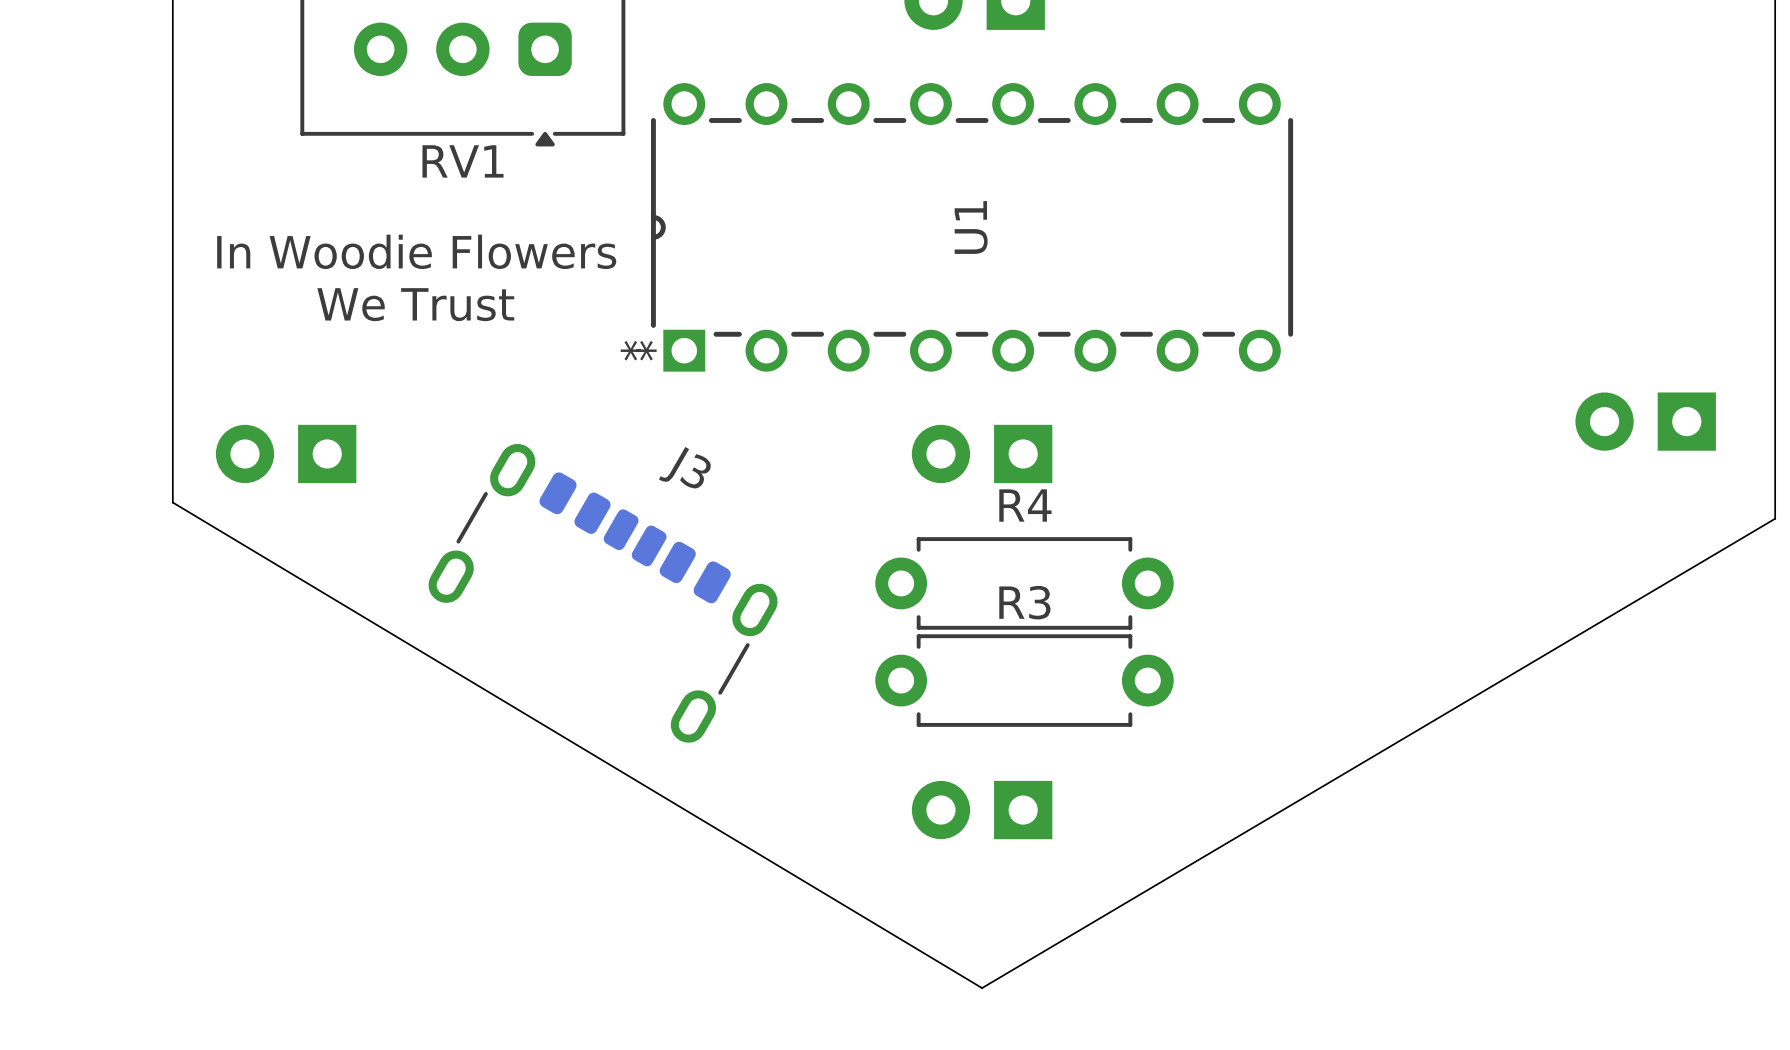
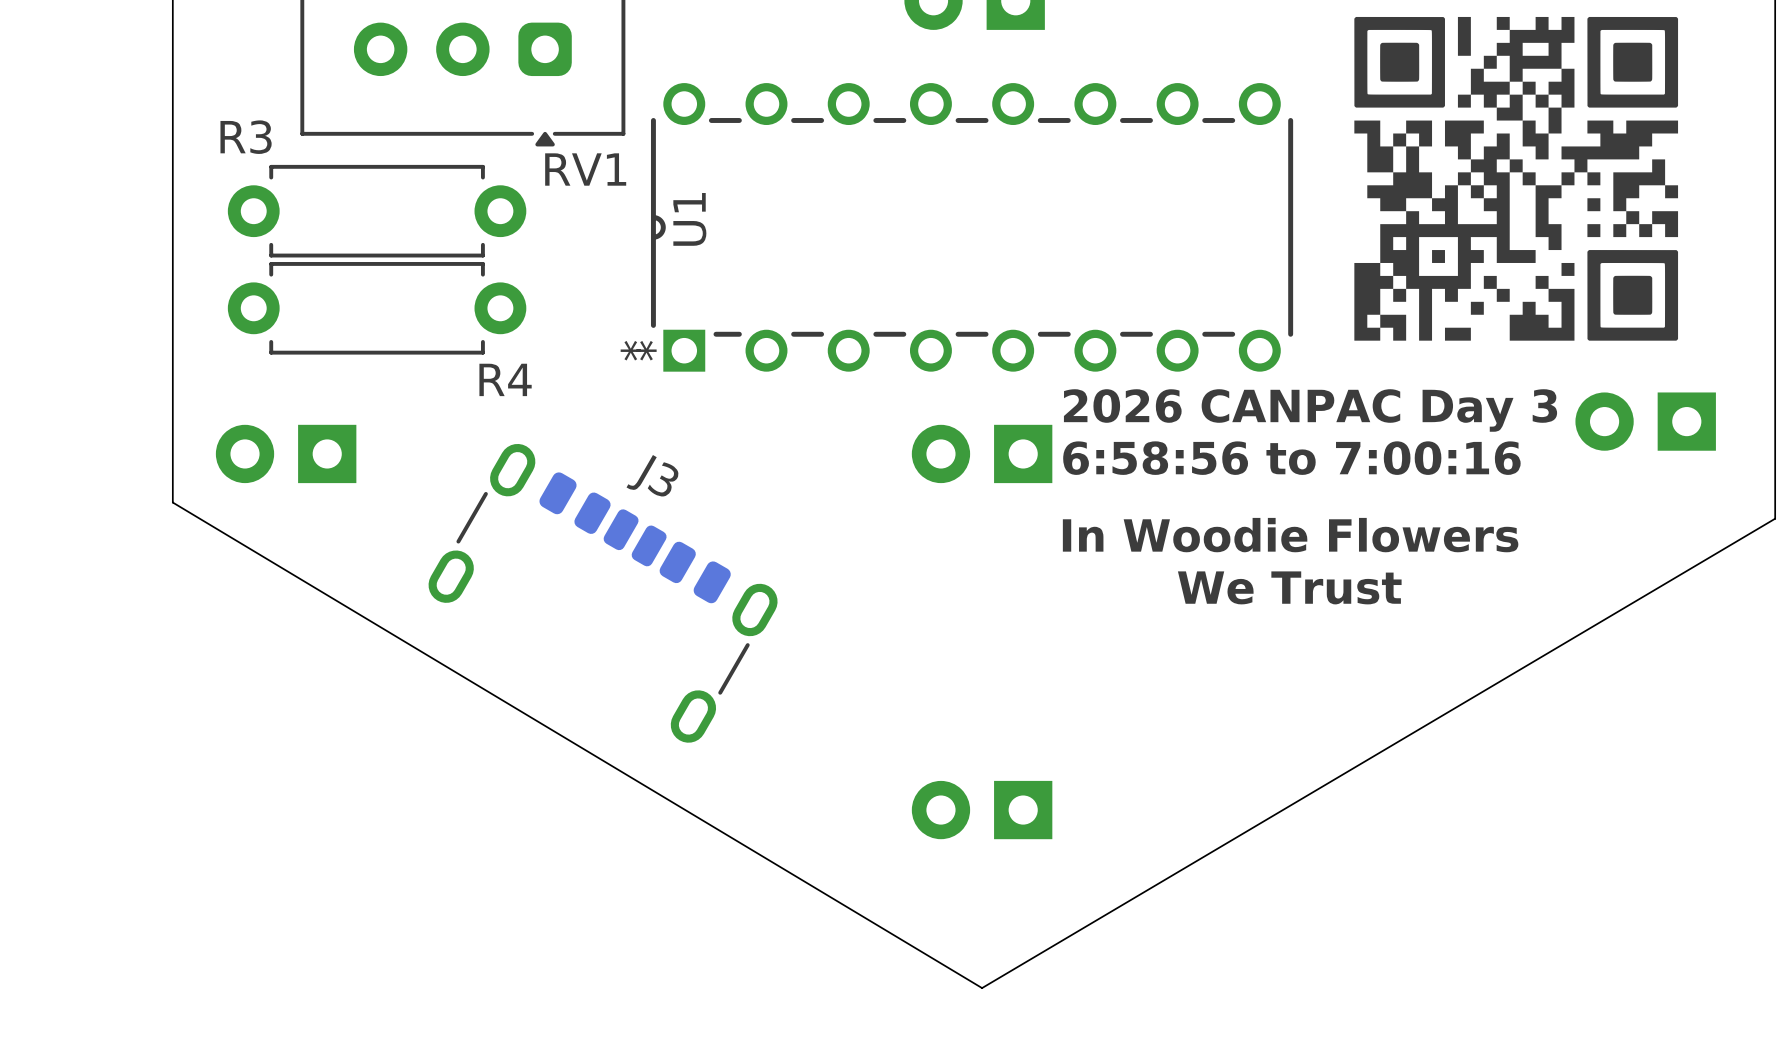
drawing: none -> [1354, 16, 1679, 341]
RV1 name position: RV1 (462, 161) -> RV1 (585, 169)
U1 name position: U1 (971, 227) -> U1 (689, 219)
text: In Woodie Flowers (416, 251) -> none
text: We Trust (415, 304) -> none
text: none -> 2026 CANPAC Day 3 (1310, 410)
text: none -> 6:58:56 to 7:00:16 (1291, 458)
J3 name position: J3 (685, 467) -> J3 (652, 476)
R4 name position: R4 (1025, 505) -> R4 (505, 379)
text: none -> In Woodie Flowers (1290, 535)
R4 position: (1024, 583) -> (377, 308)
text: none -> We Trust (1289, 587)
R3 name position: R3 (1024, 602) -> R3 (246, 137)
R3 position: (1024, 680) -> (377, 211)

